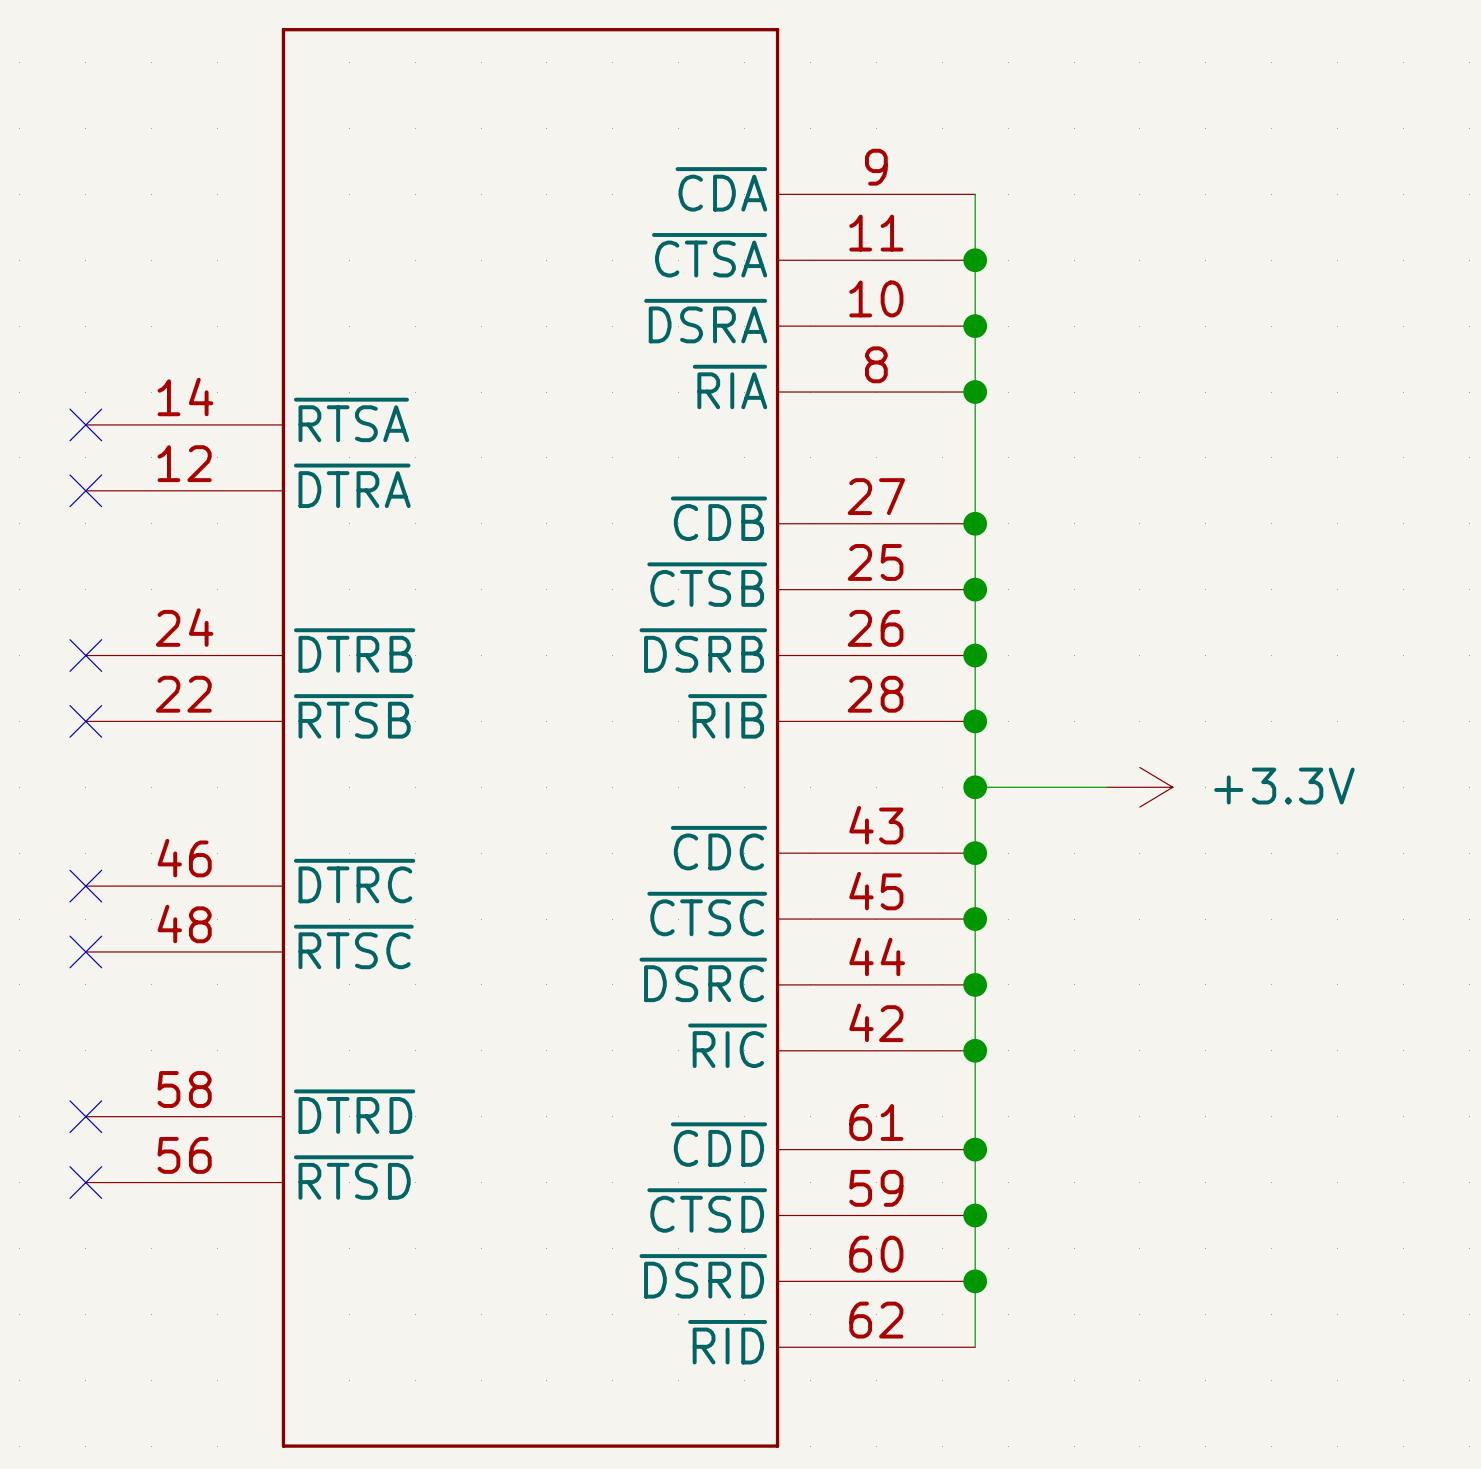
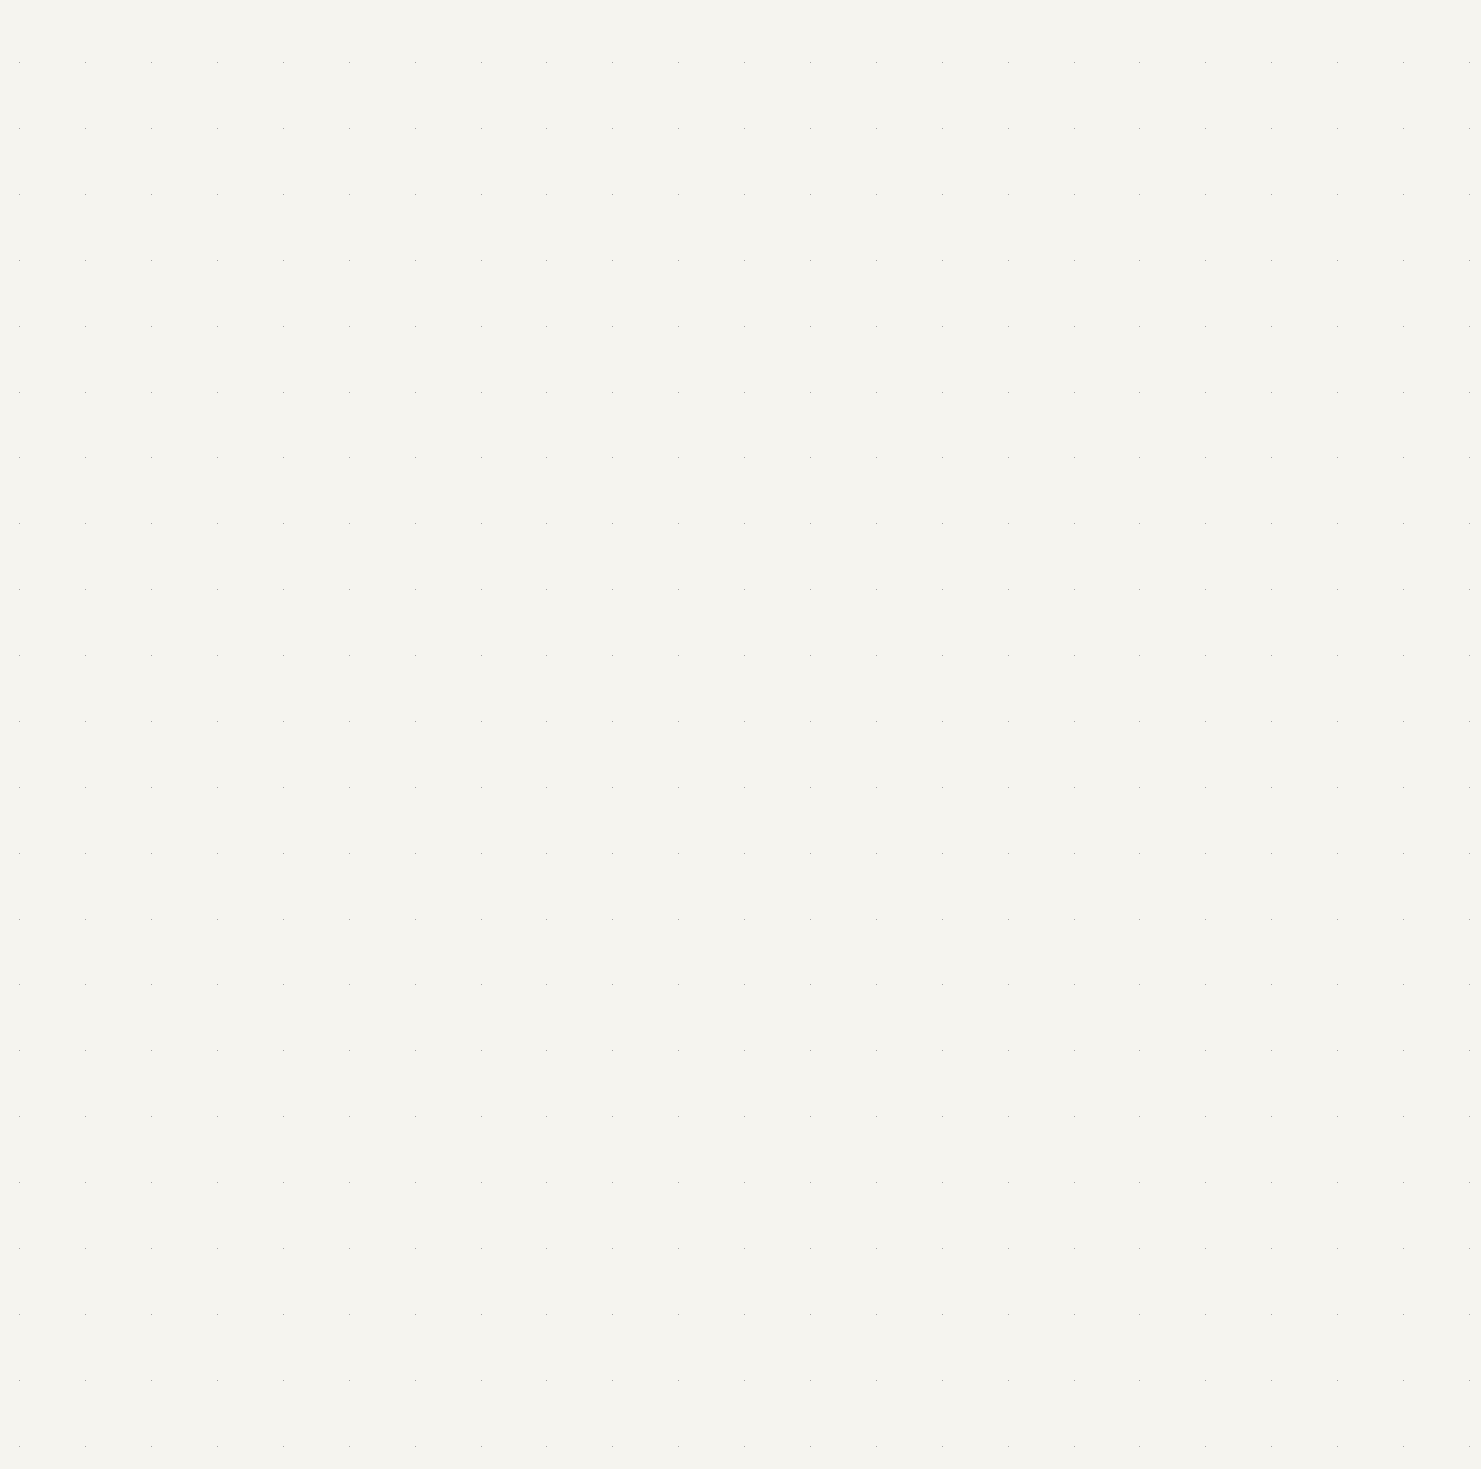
wire: (975, 194) (975, 1347) -> none
junction: (975, 260) -> none
junction: (975, 326) -> none
junction: (975, 392) -> none
no-connect mark: (85, 424) -> none
no-connect mark: (85, 490) -> none
junction: (975, 523) -> none
junction: (975, 589) -> none
no-connect mark: (85, 655) -> none
junction: (975, 655) -> none
no-connect mark: (85, 721) -> none
junction: (975, 721) -> none
part: (530, 737) -> none
wire: (975, 787) (1106, 787) -> none
junction: (975, 787) -> none
power symbol: +3.3V (1139, 787) -> none
junction: (975, 853) -> none
no-connect mark: (85, 886) -> none
junction: (975, 919) -> none
no-connect mark: (85, 951) -> none
junction: (975, 984) -> none
junction: (975, 1050) -> none
no-connect mark: (85, 1116) -> none
junction: (975, 1149) -> none
no-connect mark: (85, 1182) -> none
junction: (975, 1215) -> none
junction: (975, 1281) -> none

